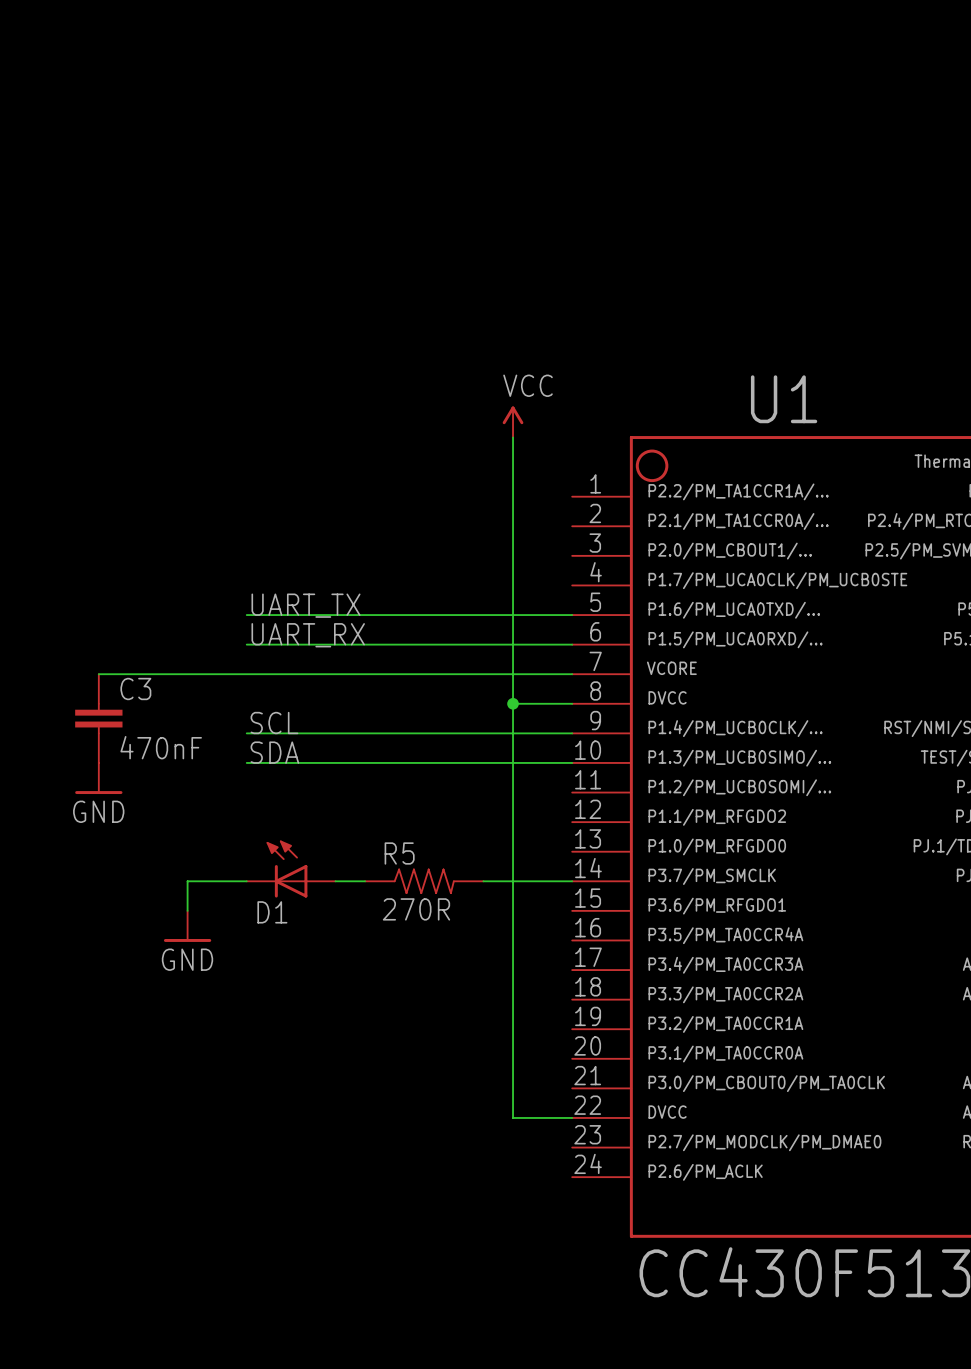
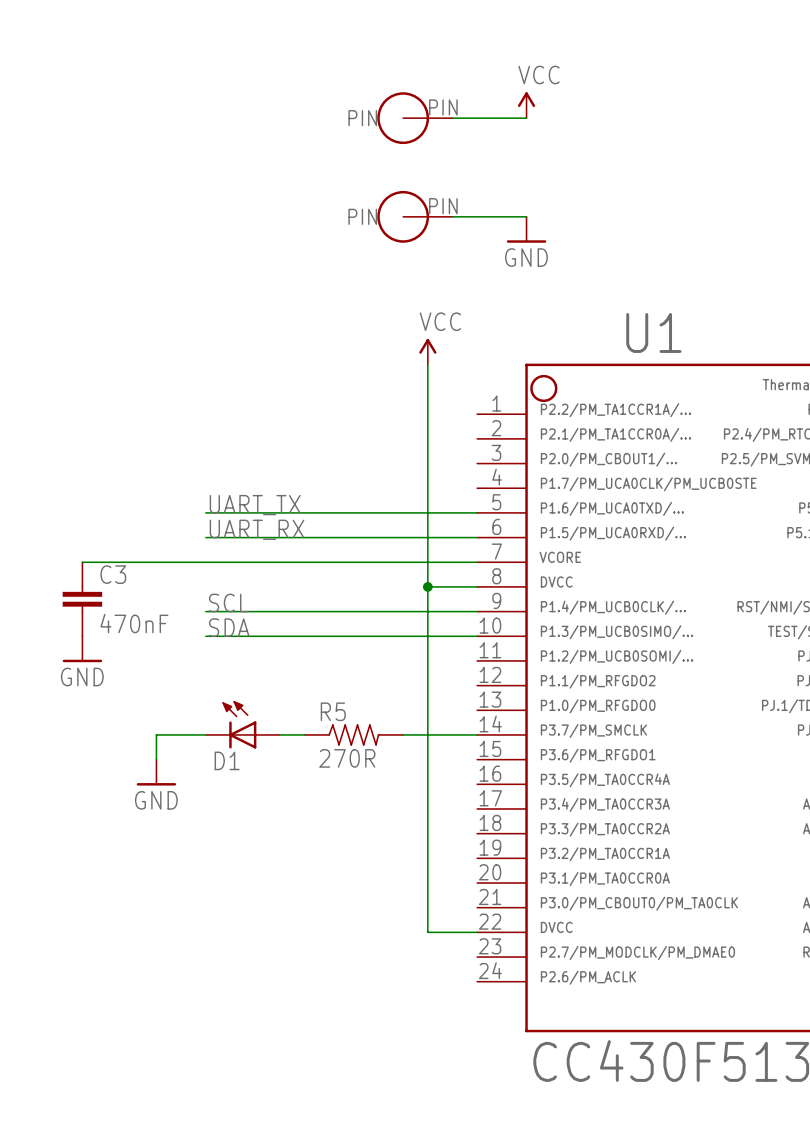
power symbol: none -> VCC (526, 105)
part: none -> (414, 118)
wire: none -> (452, 118) (526, 118)
part: none -> (414, 216)
wire: none -> (452, 216) (526, 216)
power symbol: none -> GND (526, 229)

